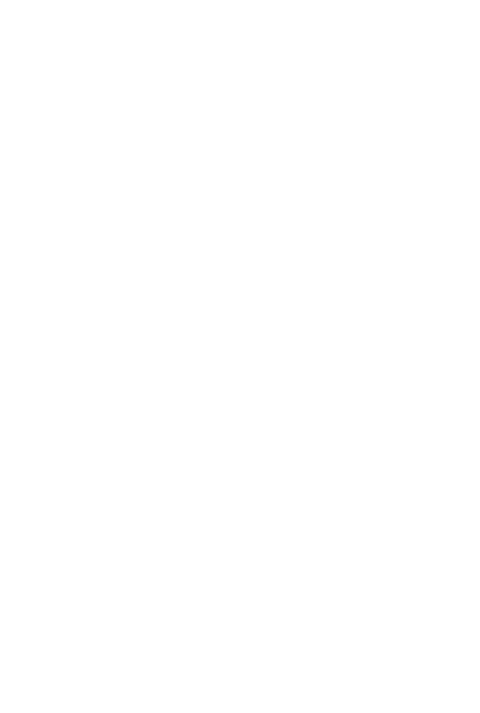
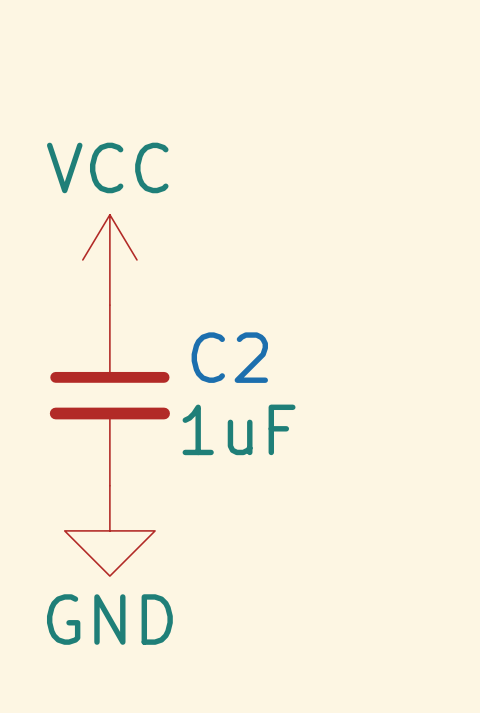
power symbol: none -> VCC (109, 259)
C2: none -> 1uF (109, 395)
power symbol: none -> GND (109, 530)

